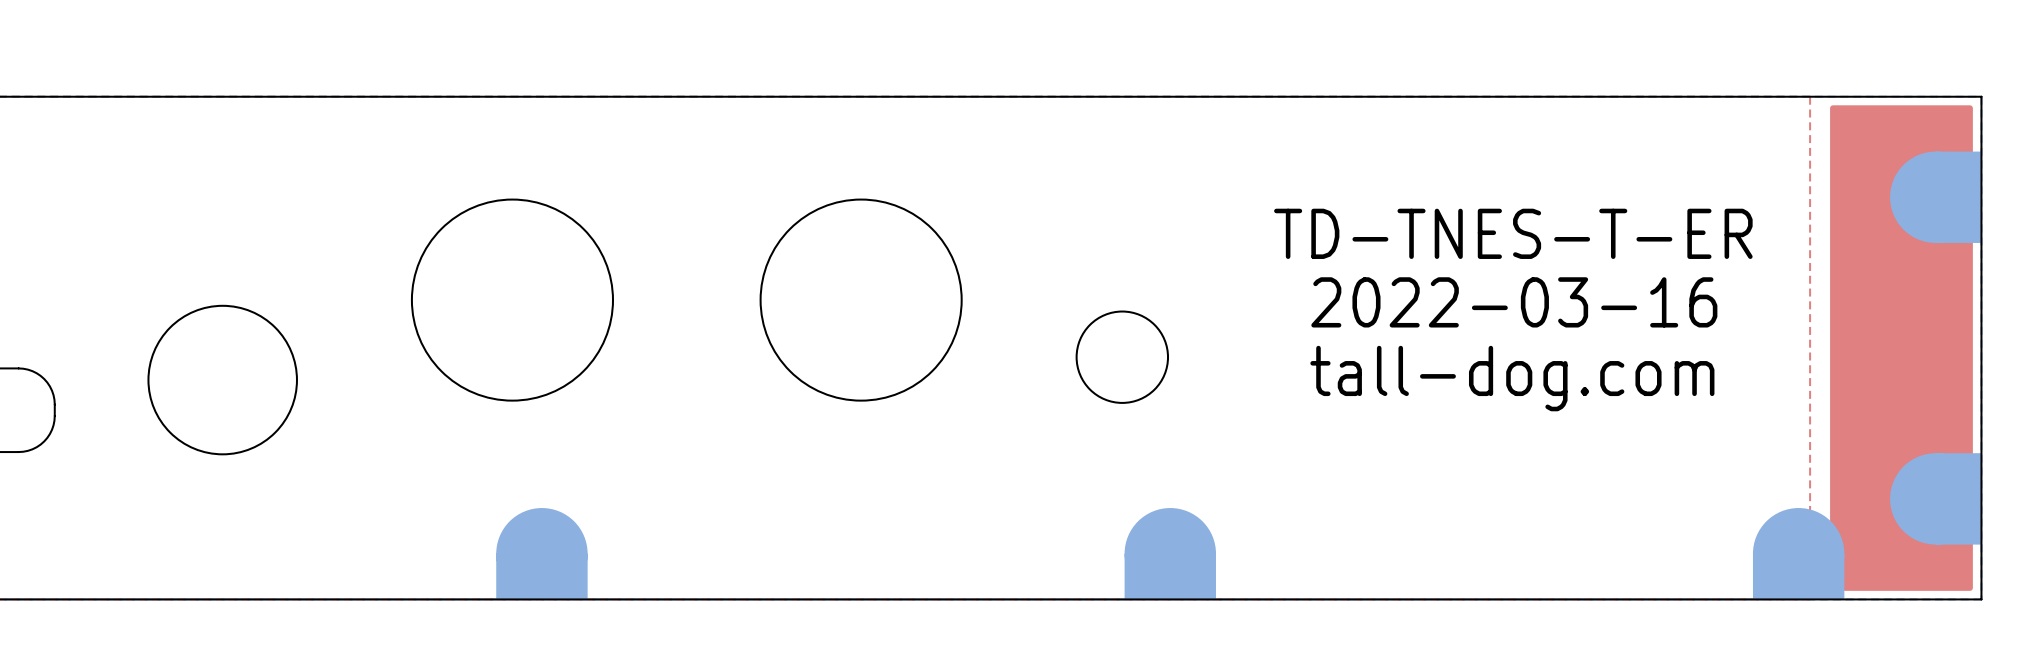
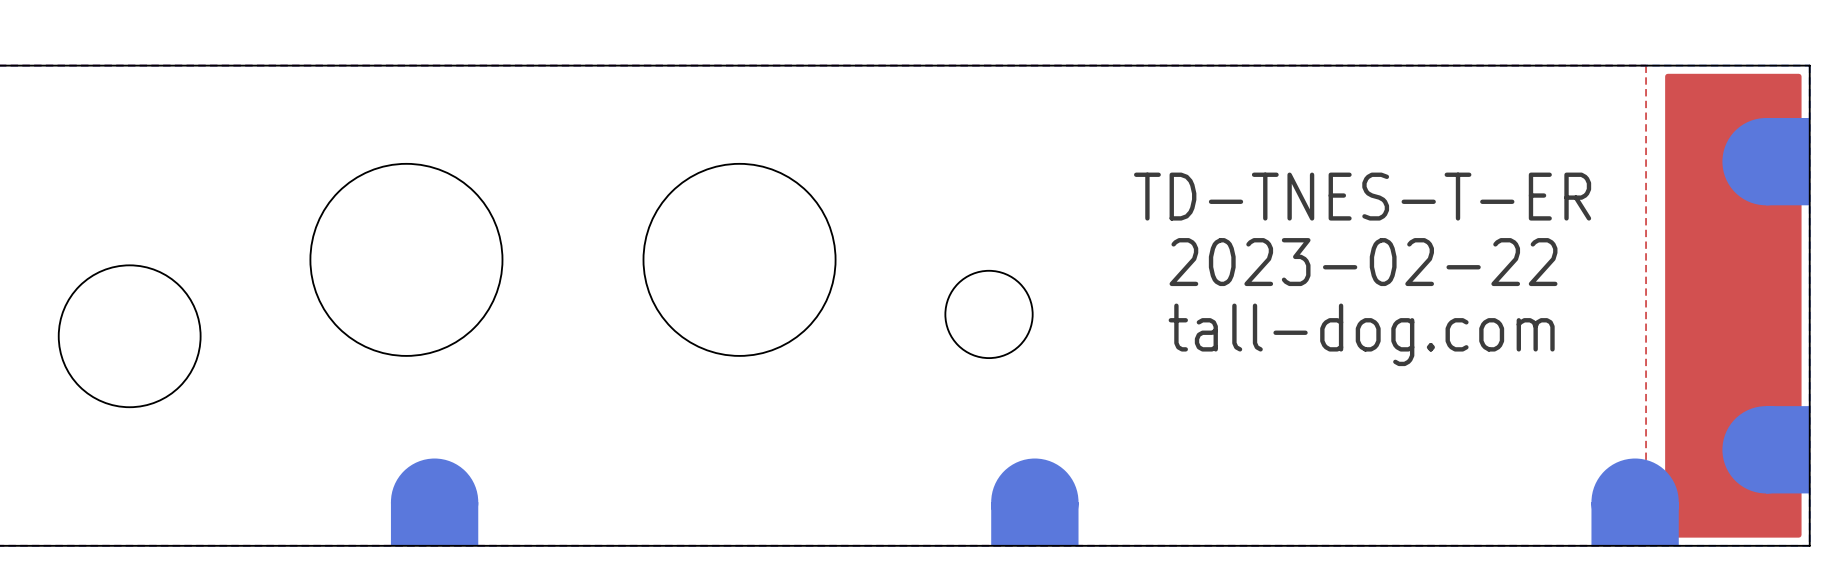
text: 2022-03-16 (1514, 302) -> 2023-02-22 (1363, 262)

